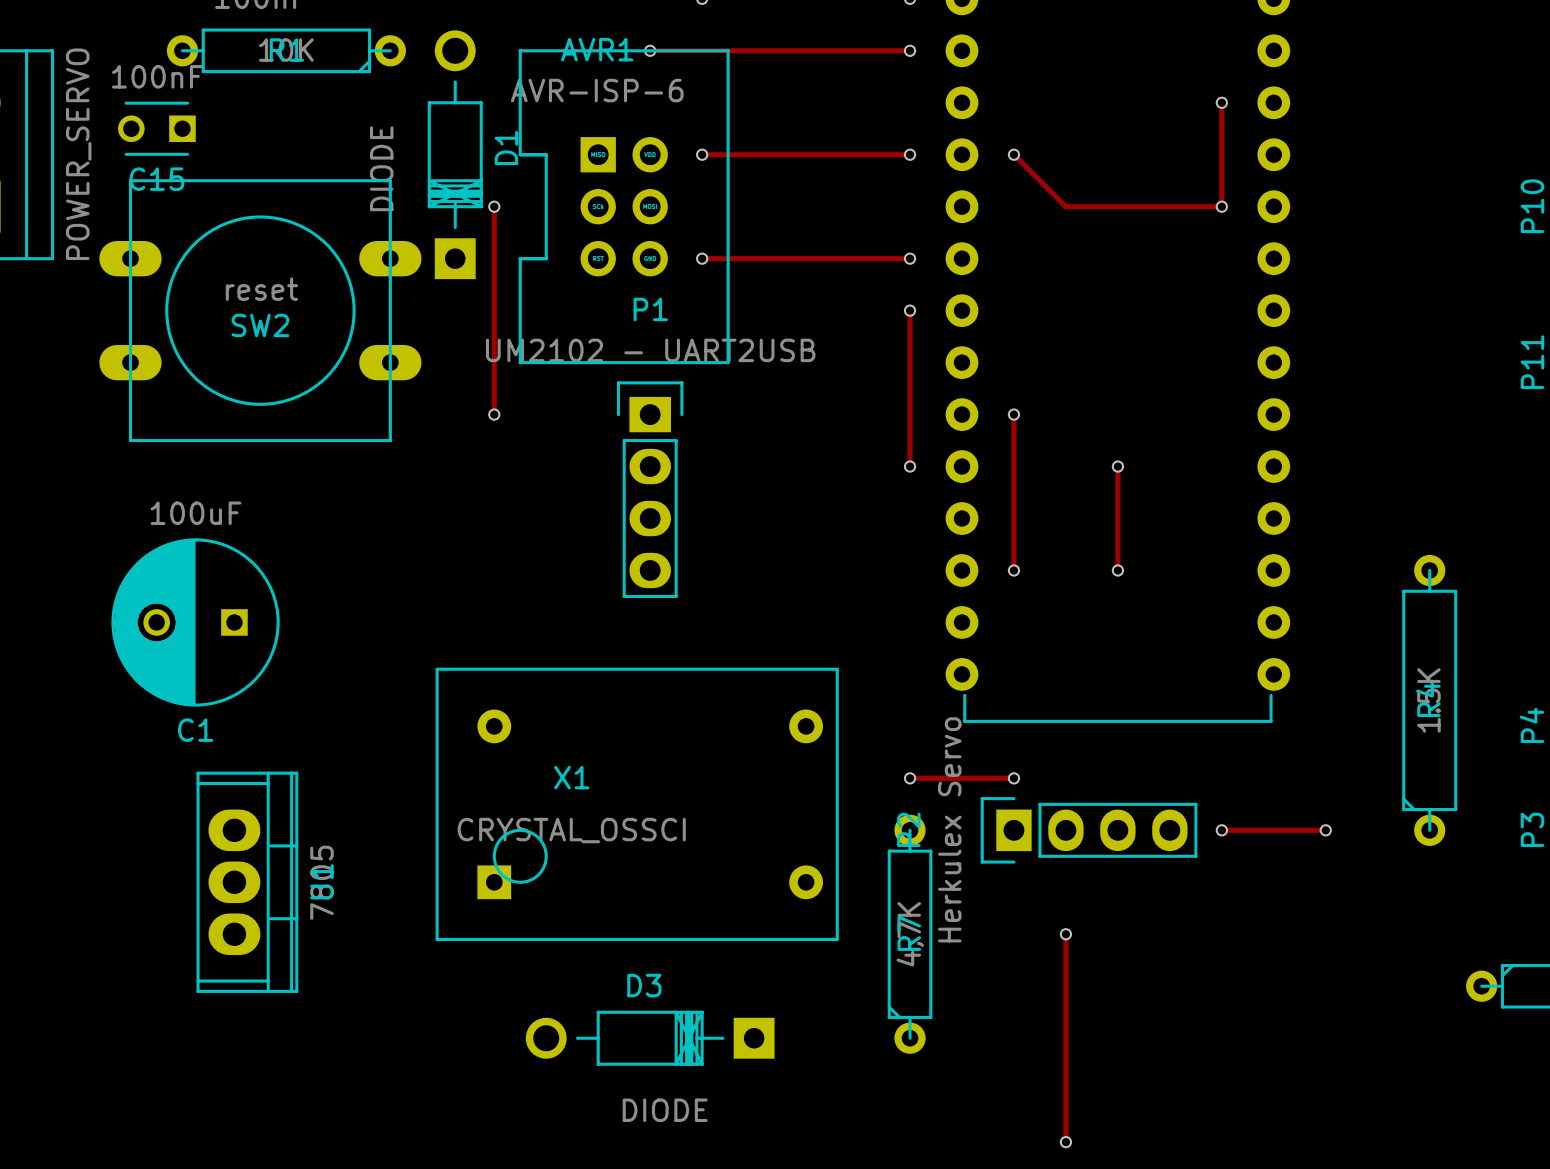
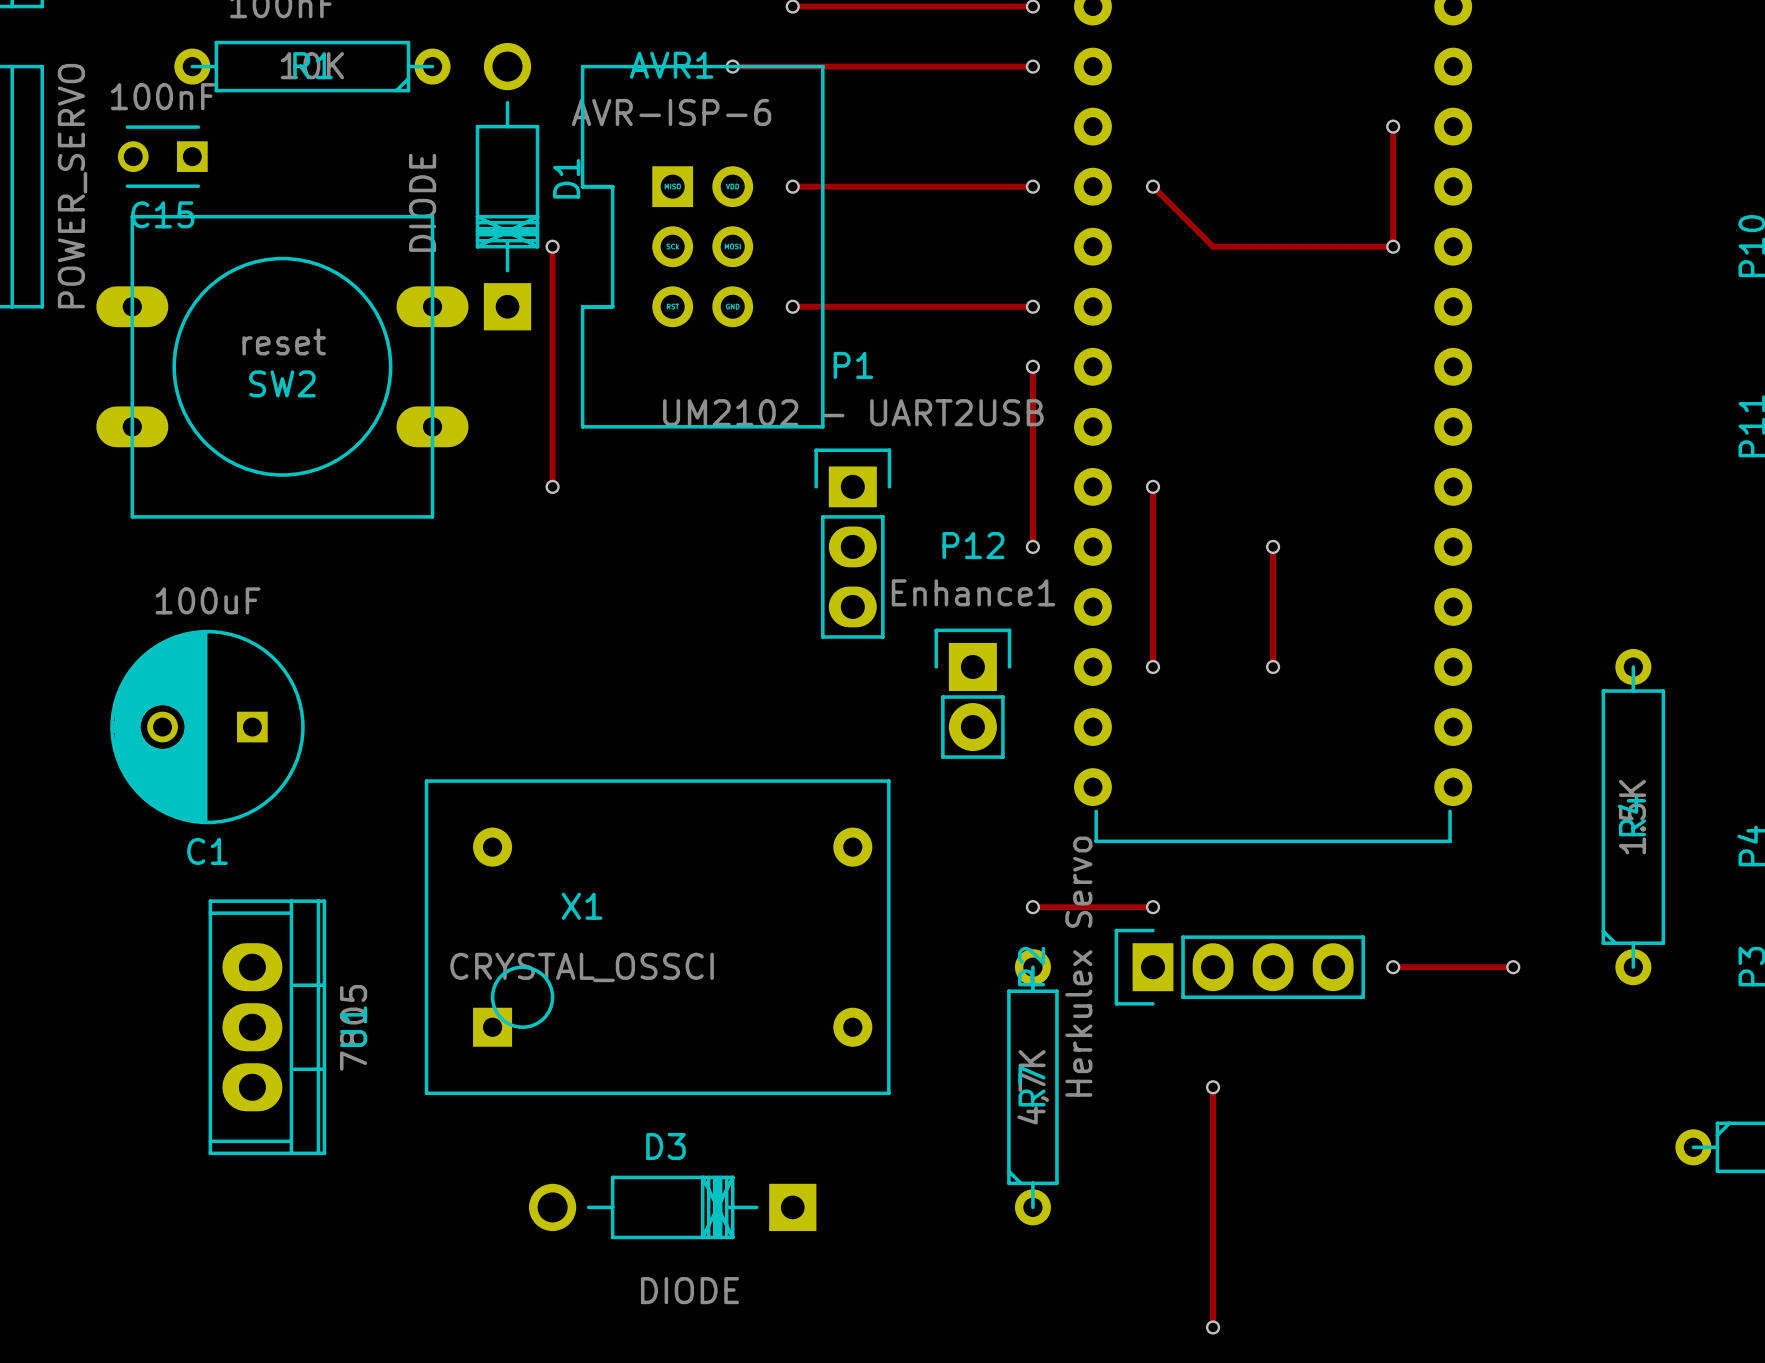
P1 footprint: [616, 381, 684, 599] -> [814, 448, 892, 639]
P12: none -> Enhance1 (972, 693)
X1 position: (637, 804) -> (657, 937)
D3 position: (650, 1038) -> (672, 1207)

